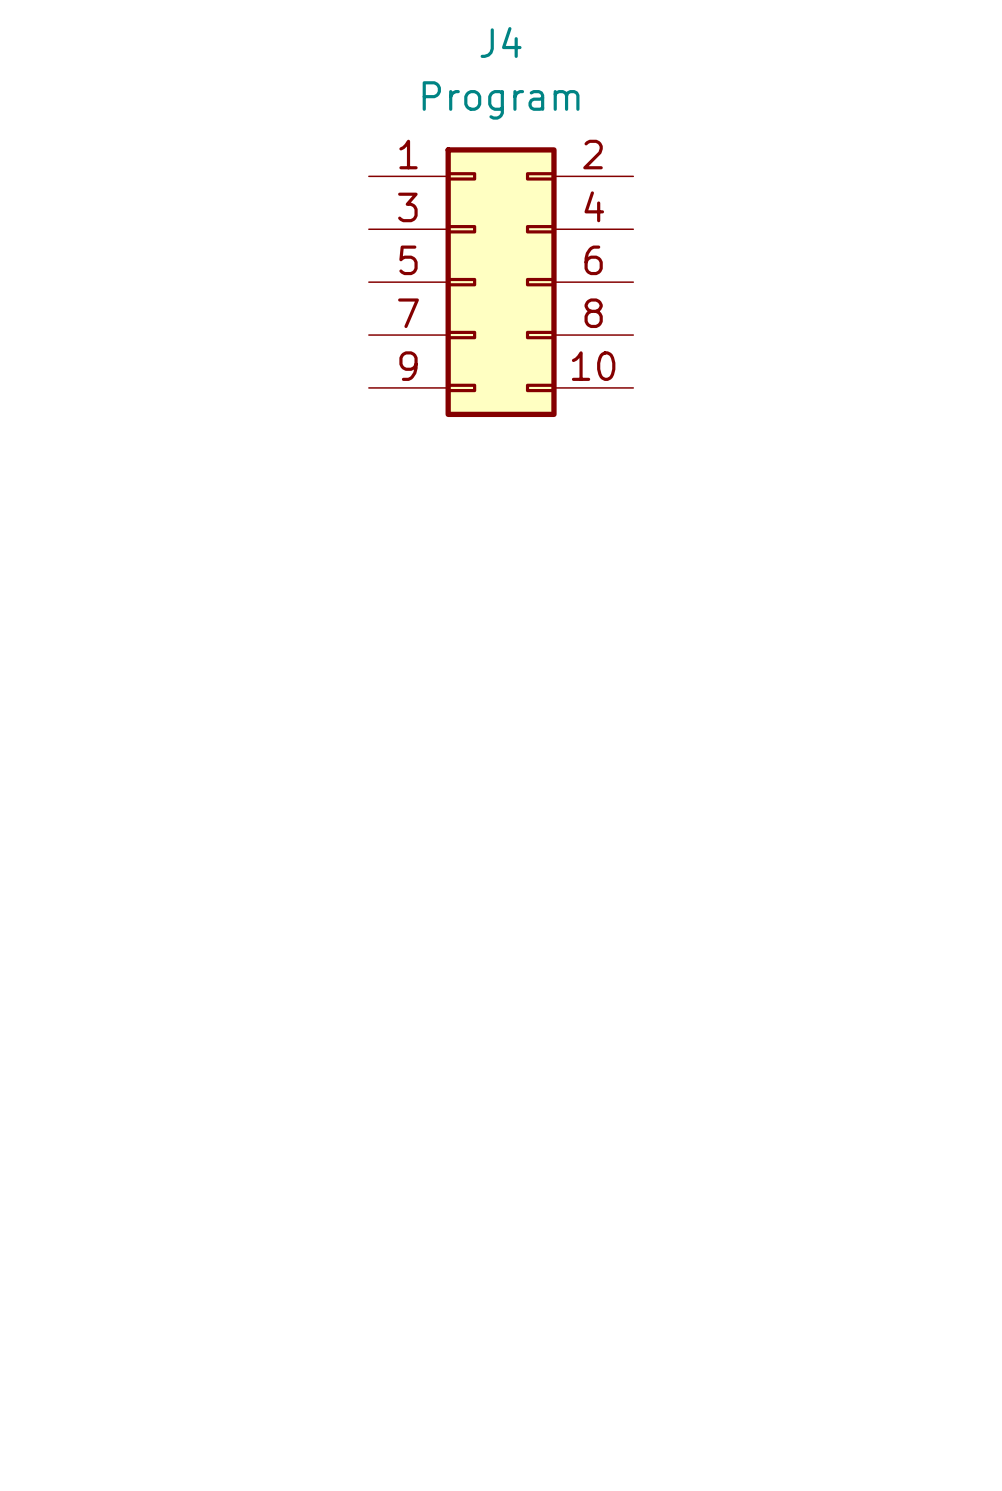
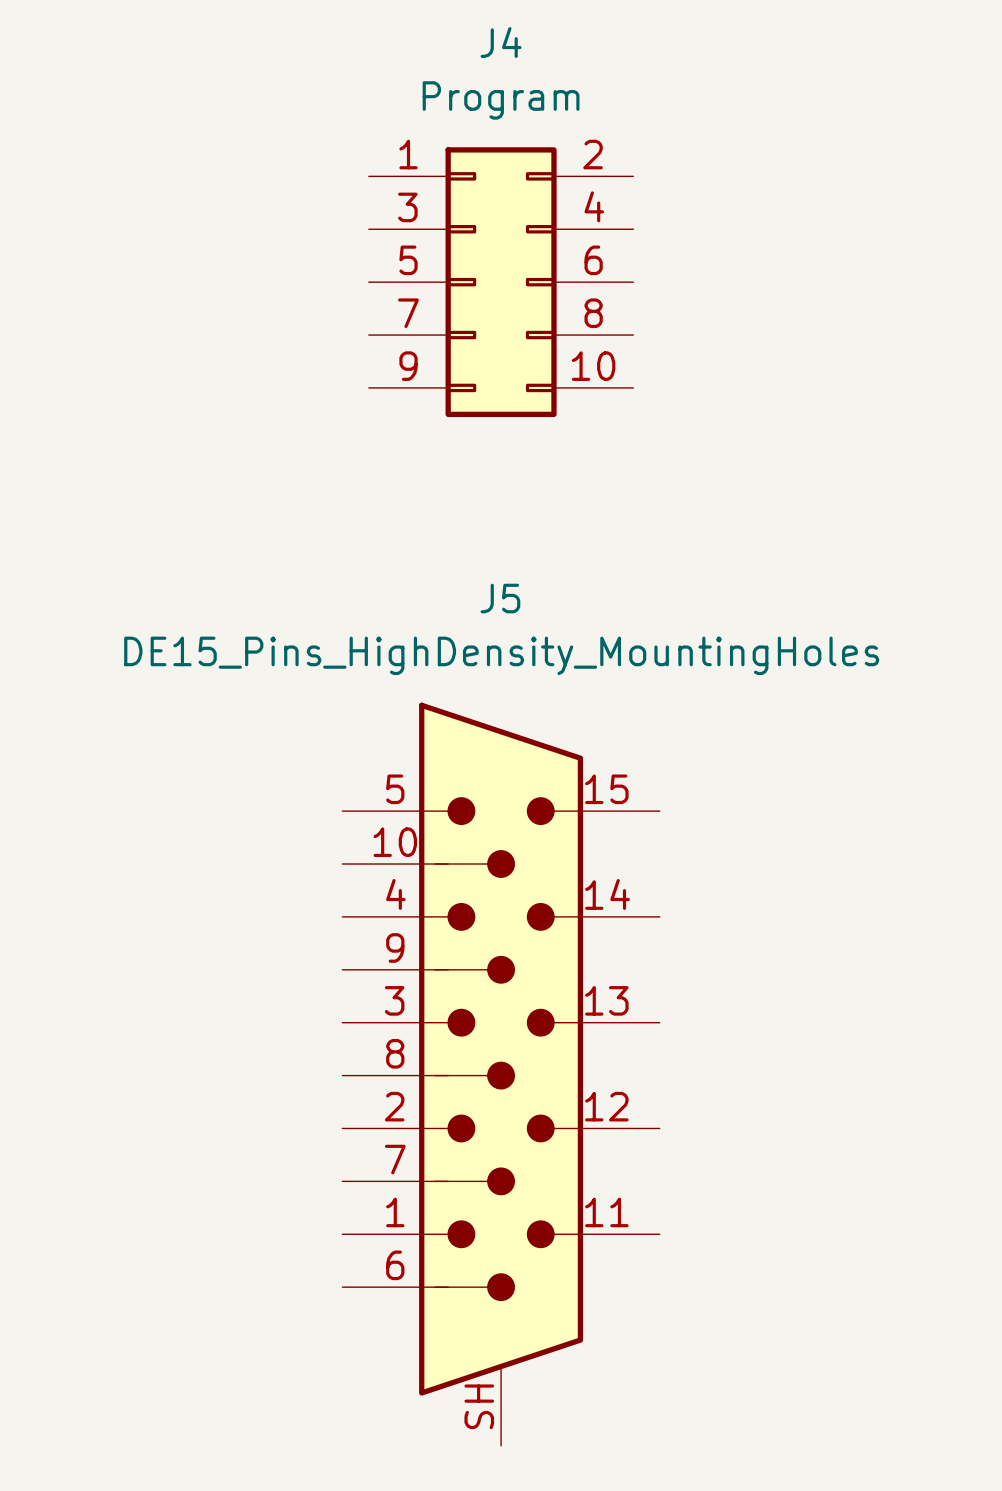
J5: none -> DE15_Pins_HighDensity_MountingHoles (501, 1074)

